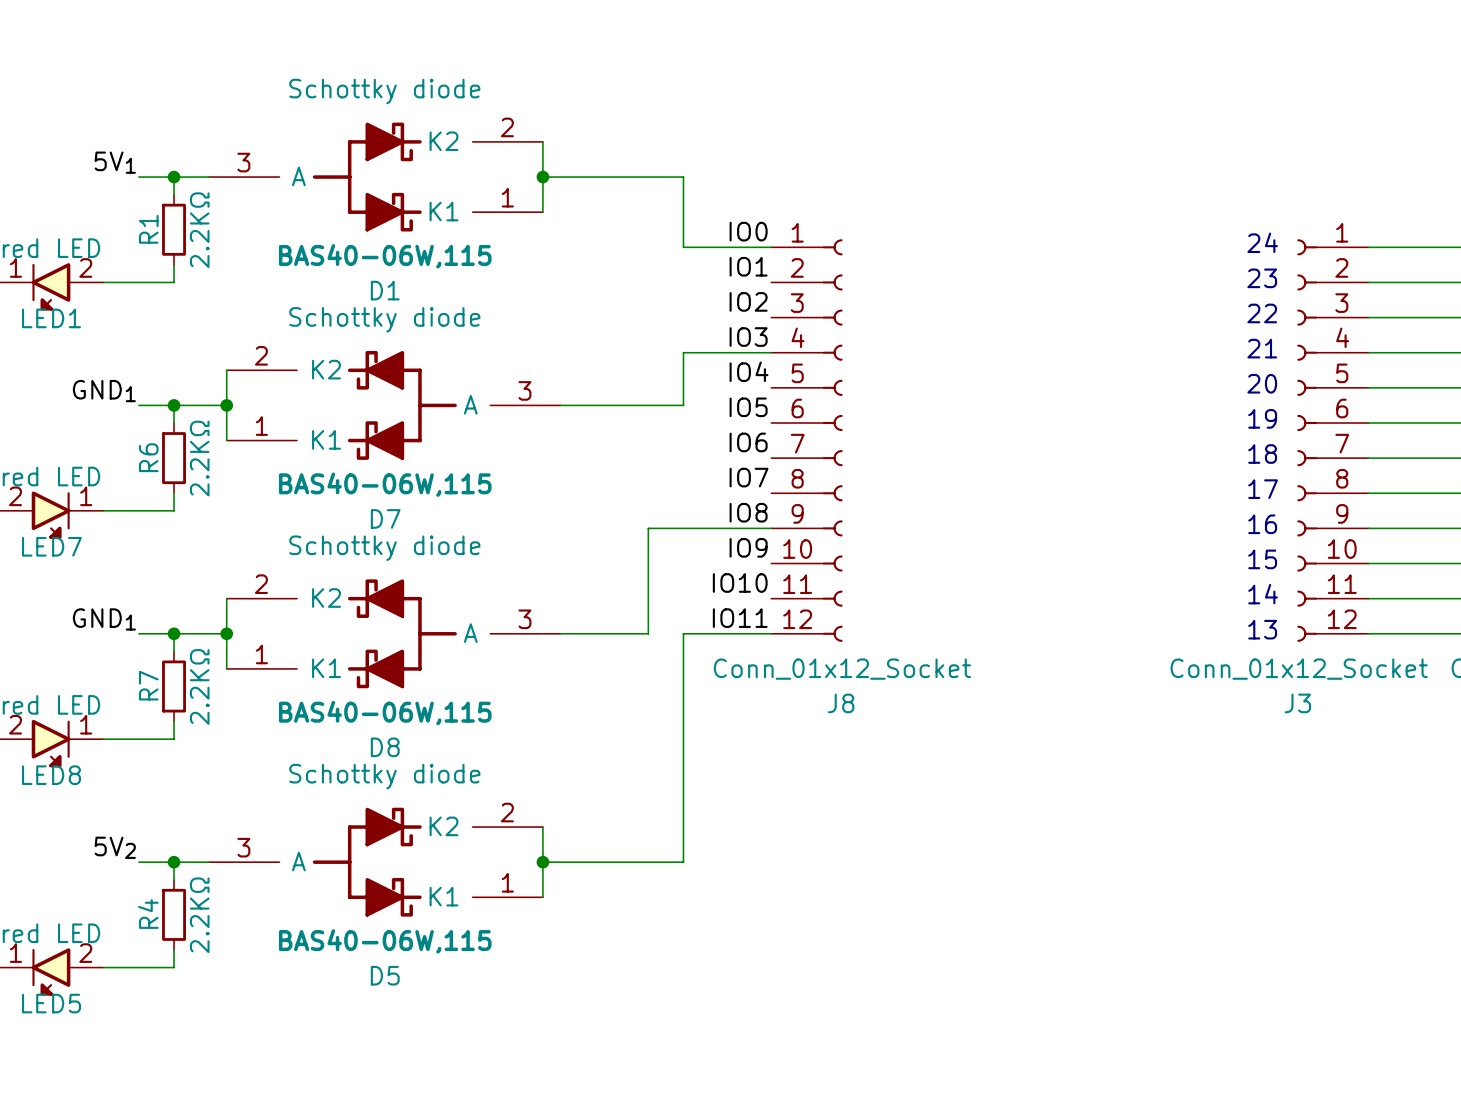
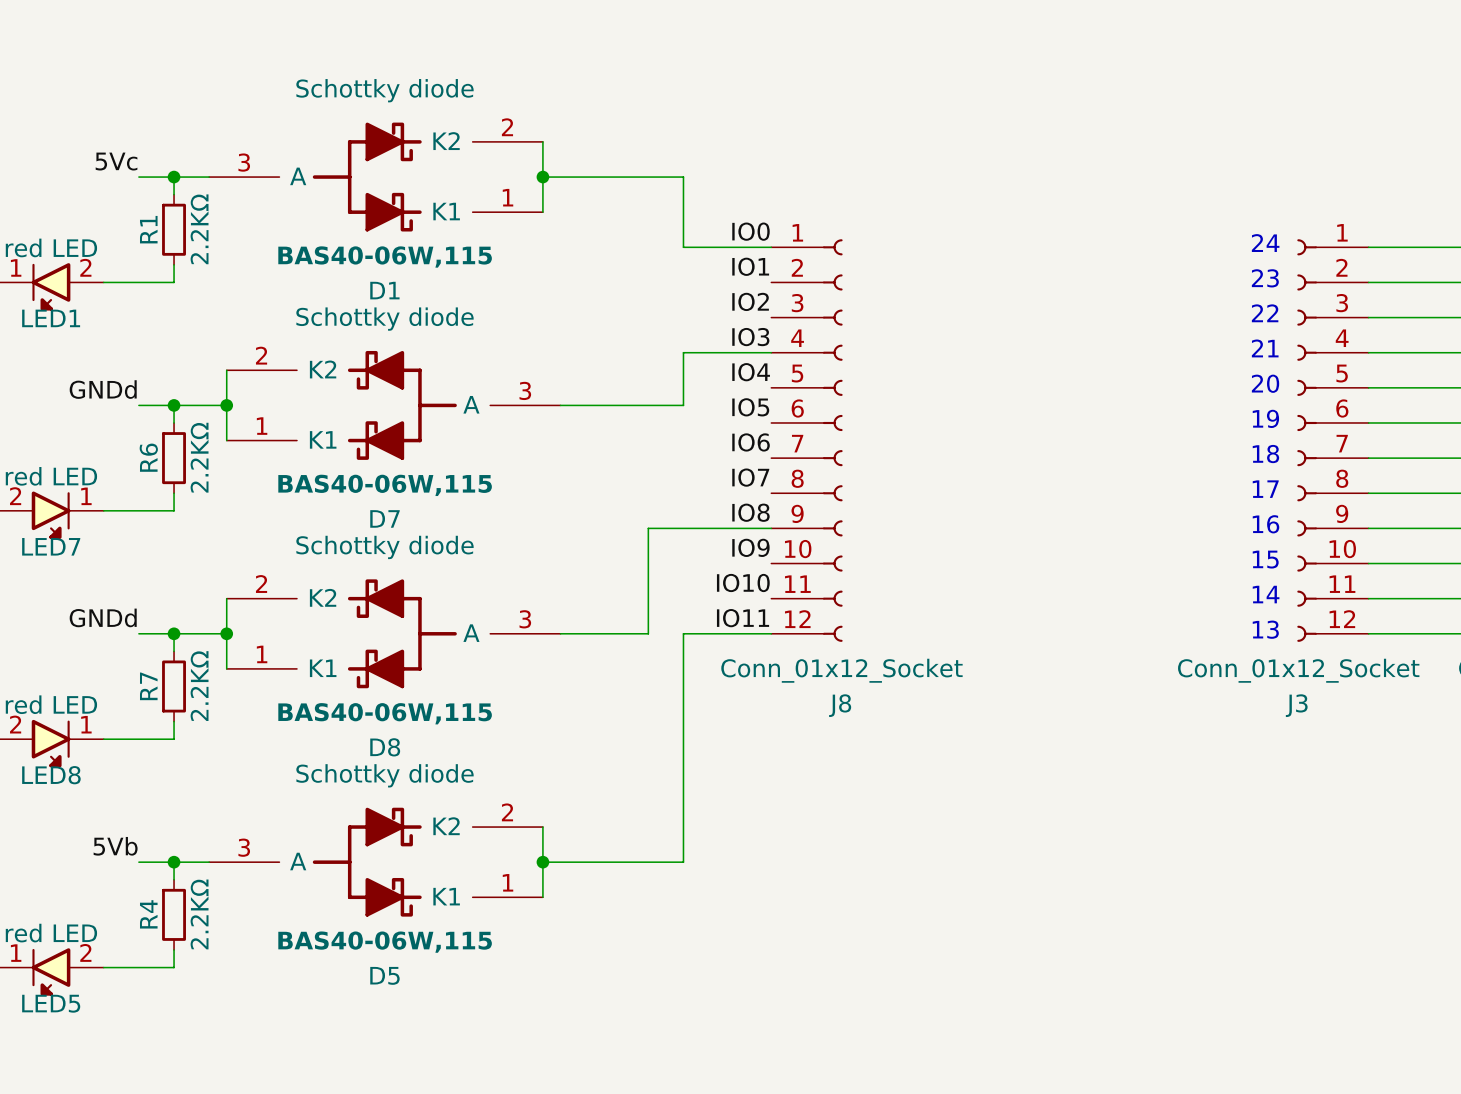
label: 5V1 (115, 162) -> 5Vc (116, 161)
label: GND1 (104, 391) -> GNDd (103, 389)
label: GND1 (104, 619) -> GNDd (103, 617)
label: 5V2 (115, 847) -> 5Vb (115, 846)

